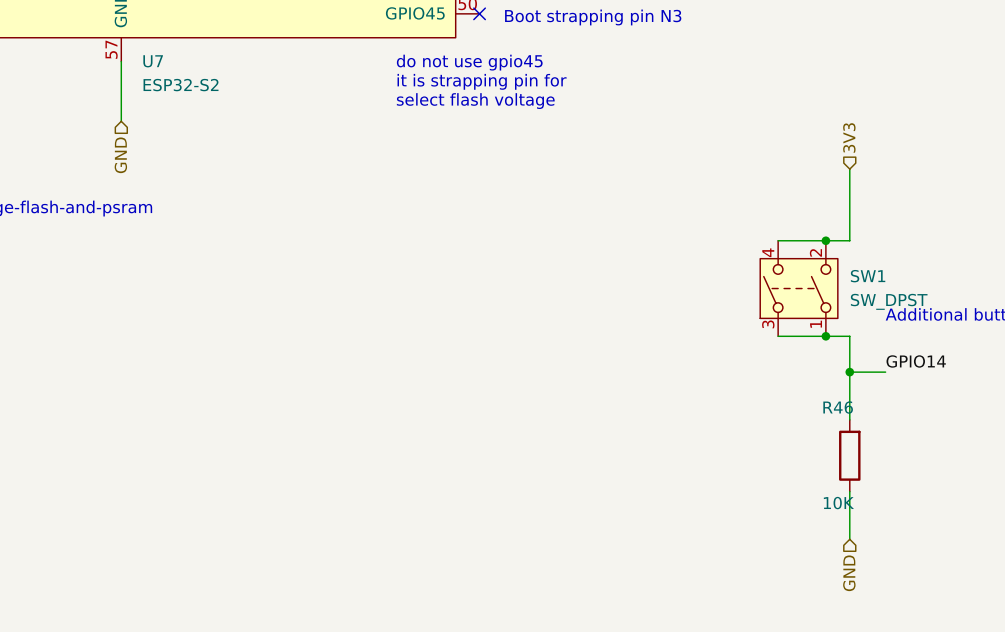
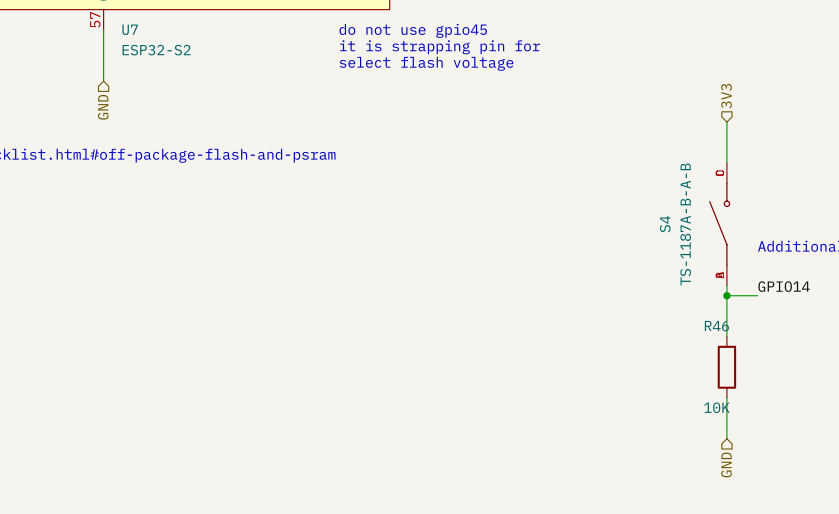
wire: (849, 216) (849, 240) (778, 240) -> none
junction: (825, 240) -> none
SW1: SW_DPST (799, 288) -> none
S4: none -> TS-1187A-B-A-B (719, 224)
wire: (778, 336) (849, 336) (849, 360) -> none
junction: (825, 336) -> none

